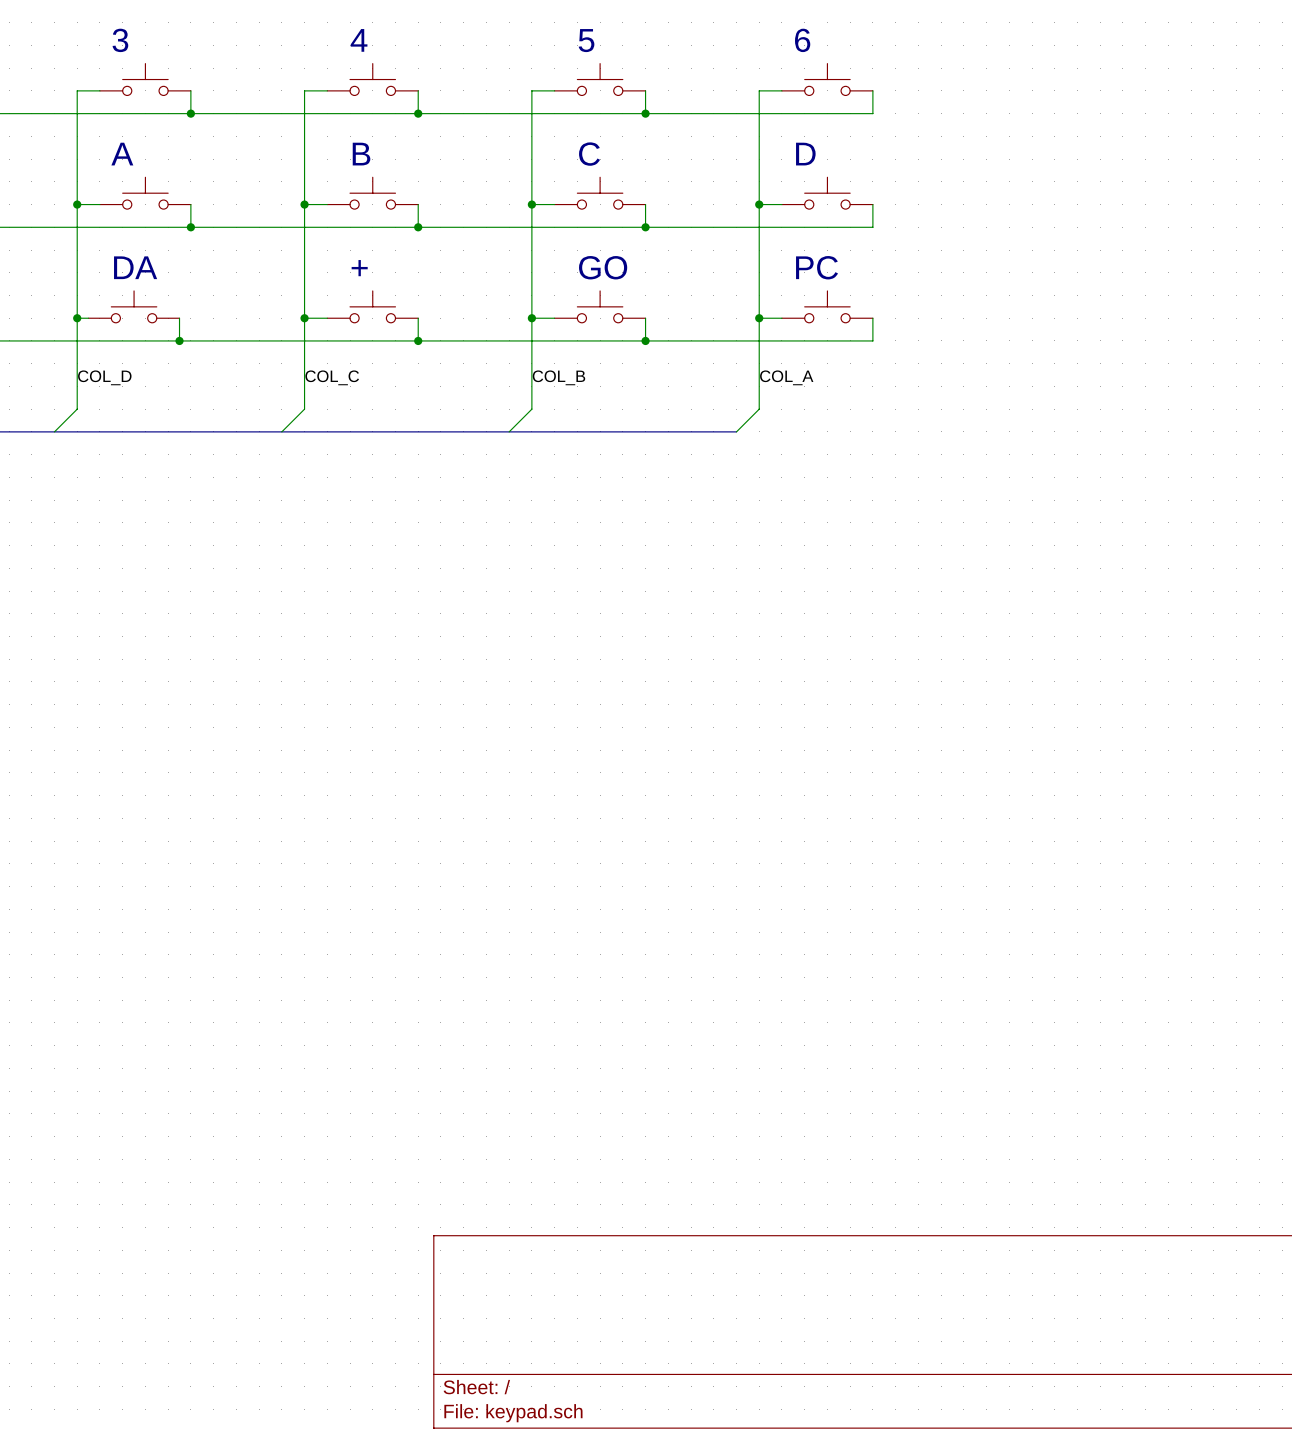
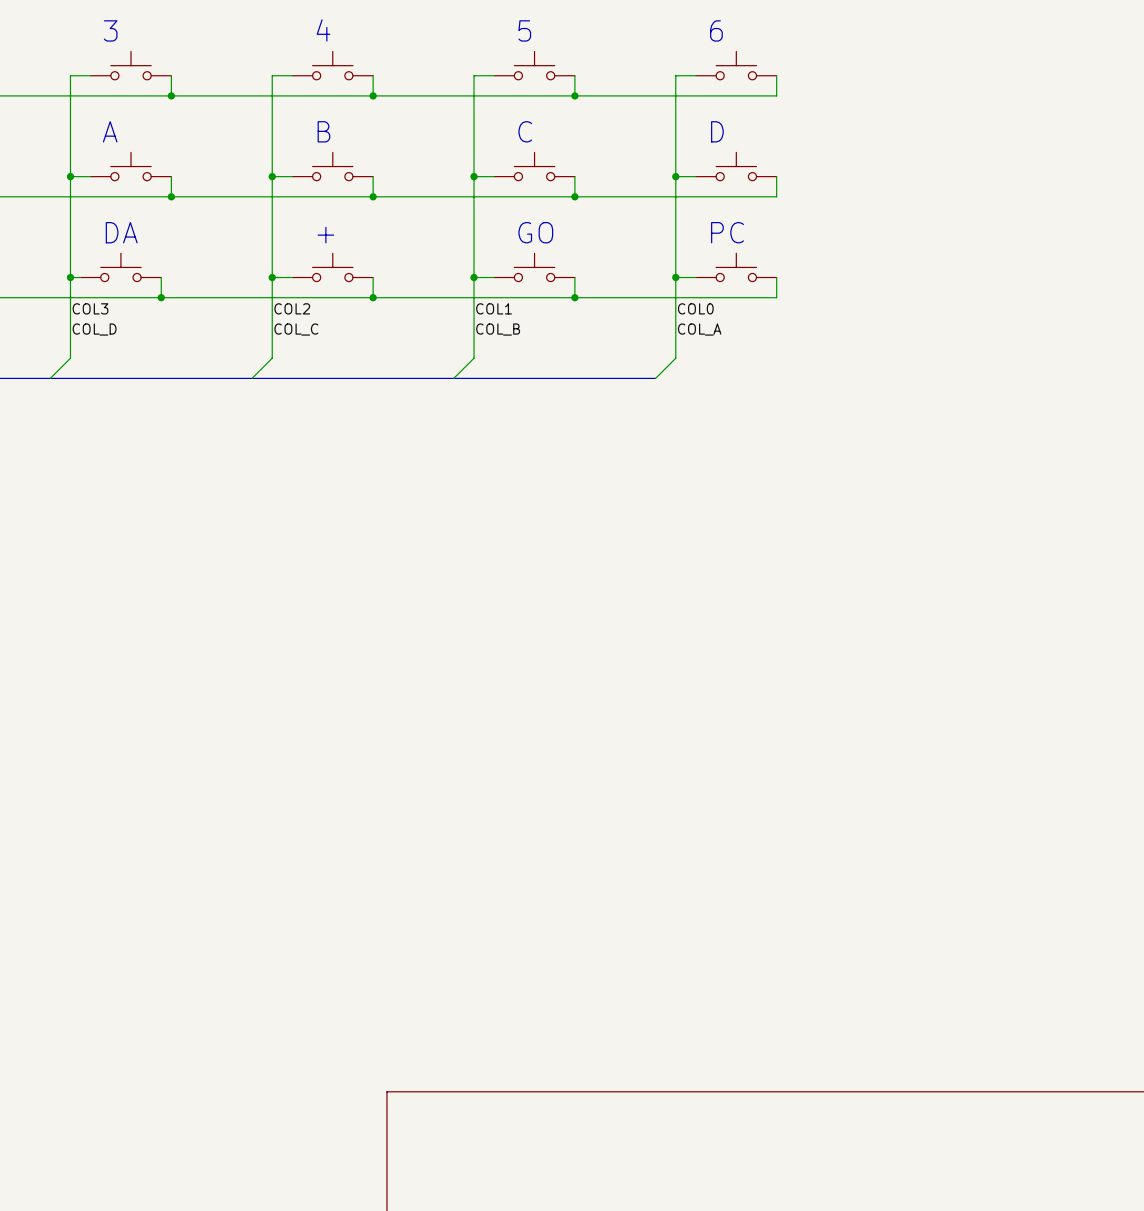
label: none -> COL3 (90, 308)
label: none -> COL2 (292, 308)
label: none -> COL1 (494, 308)
label: none -> COL0 (695, 308)

